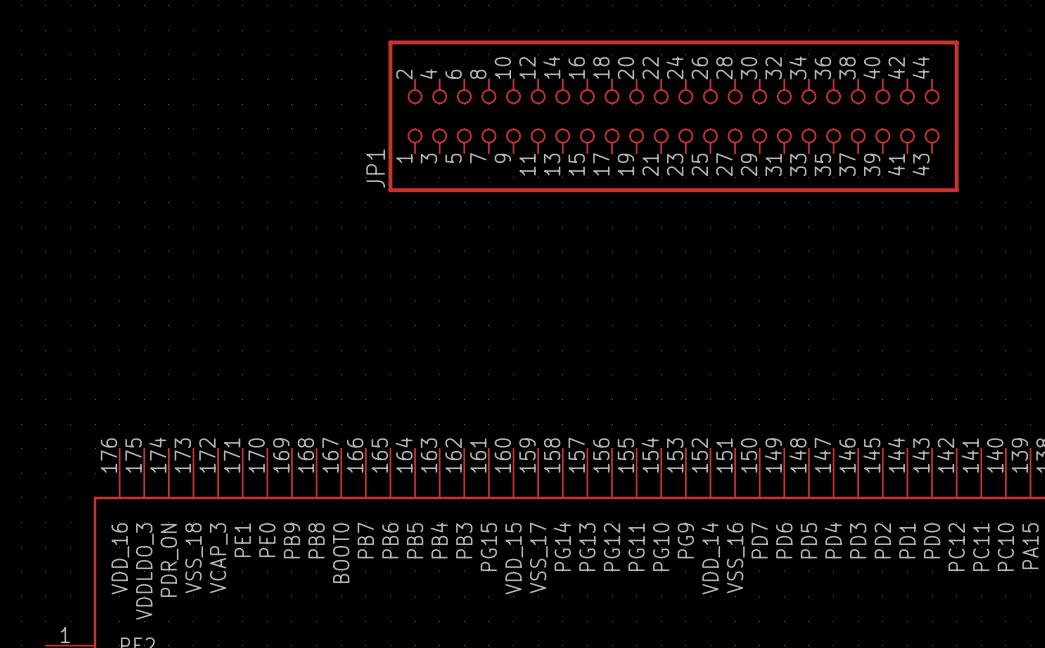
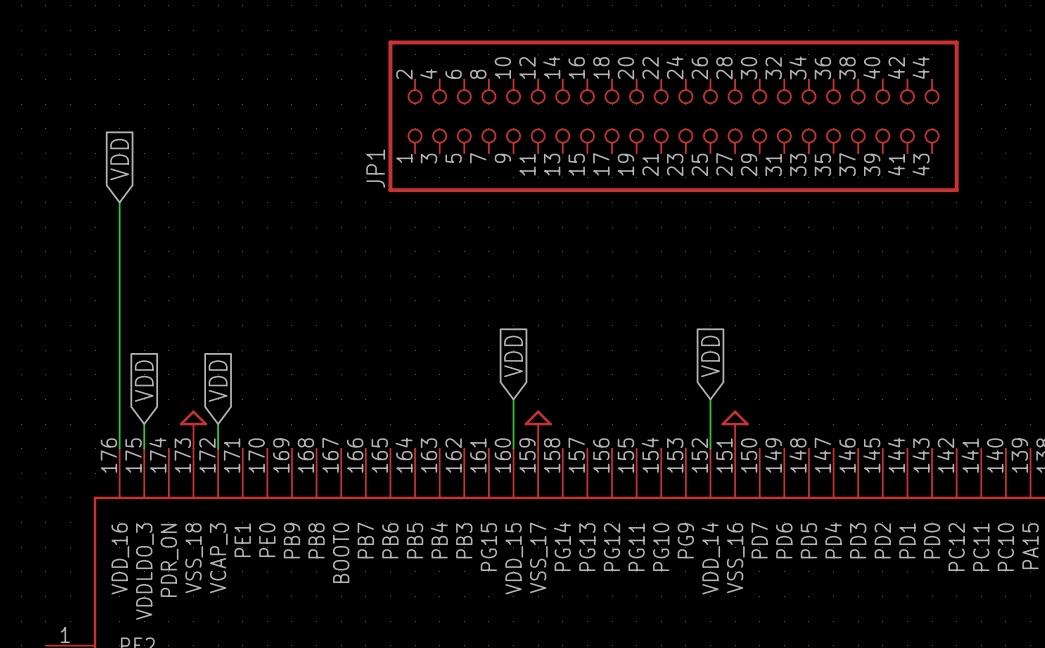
global label: none -> VDD (119, 159)
wire: none -> (119, 202) (119, 448)
global label: none -> VDD (513, 356)
global label: none -> VDD (710, 356)
global label: none -> VDD (144, 381)
global label: none -> VDD (218, 381)
wire: none -> (513, 399) (513, 448)
wire: none -> (710, 399) (710, 448)
wire: none -> (144, 424) (144, 448)
wire: none -> (218, 424) (218, 448)
power symbol: none -> (193, 429)
power symbol: none -> (538, 429)
power symbol: none -> (735, 429)

